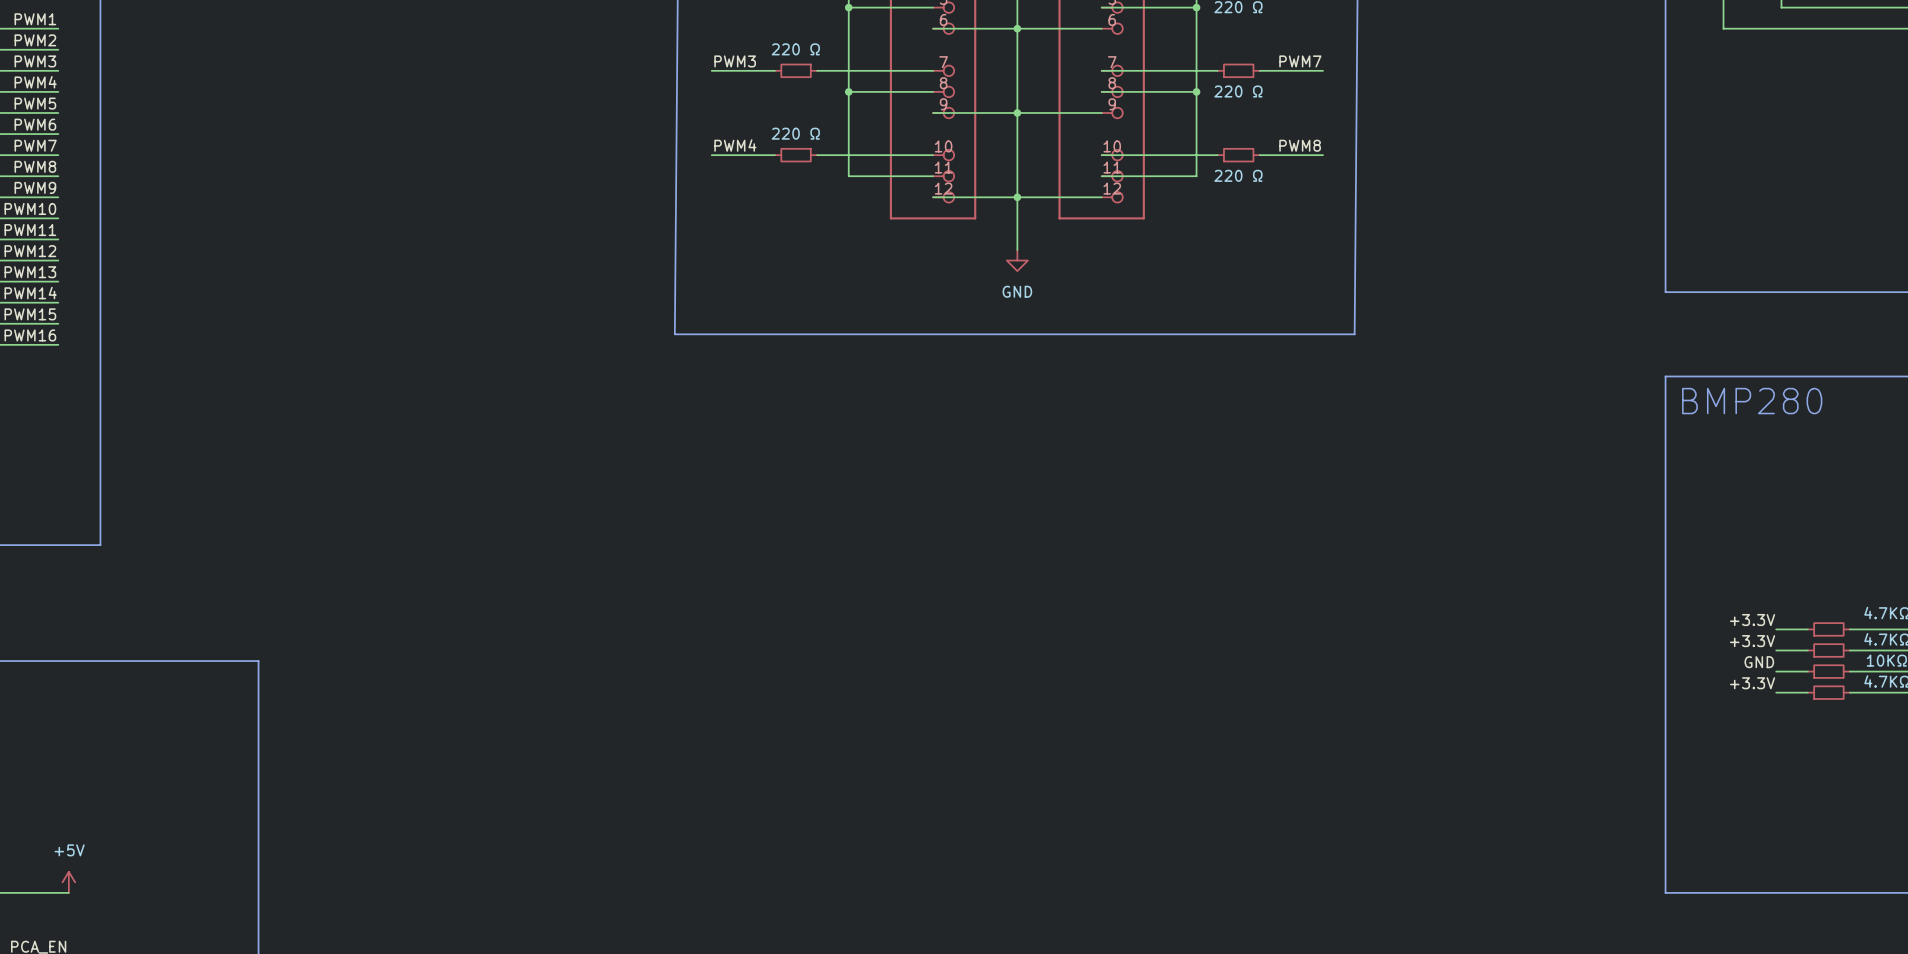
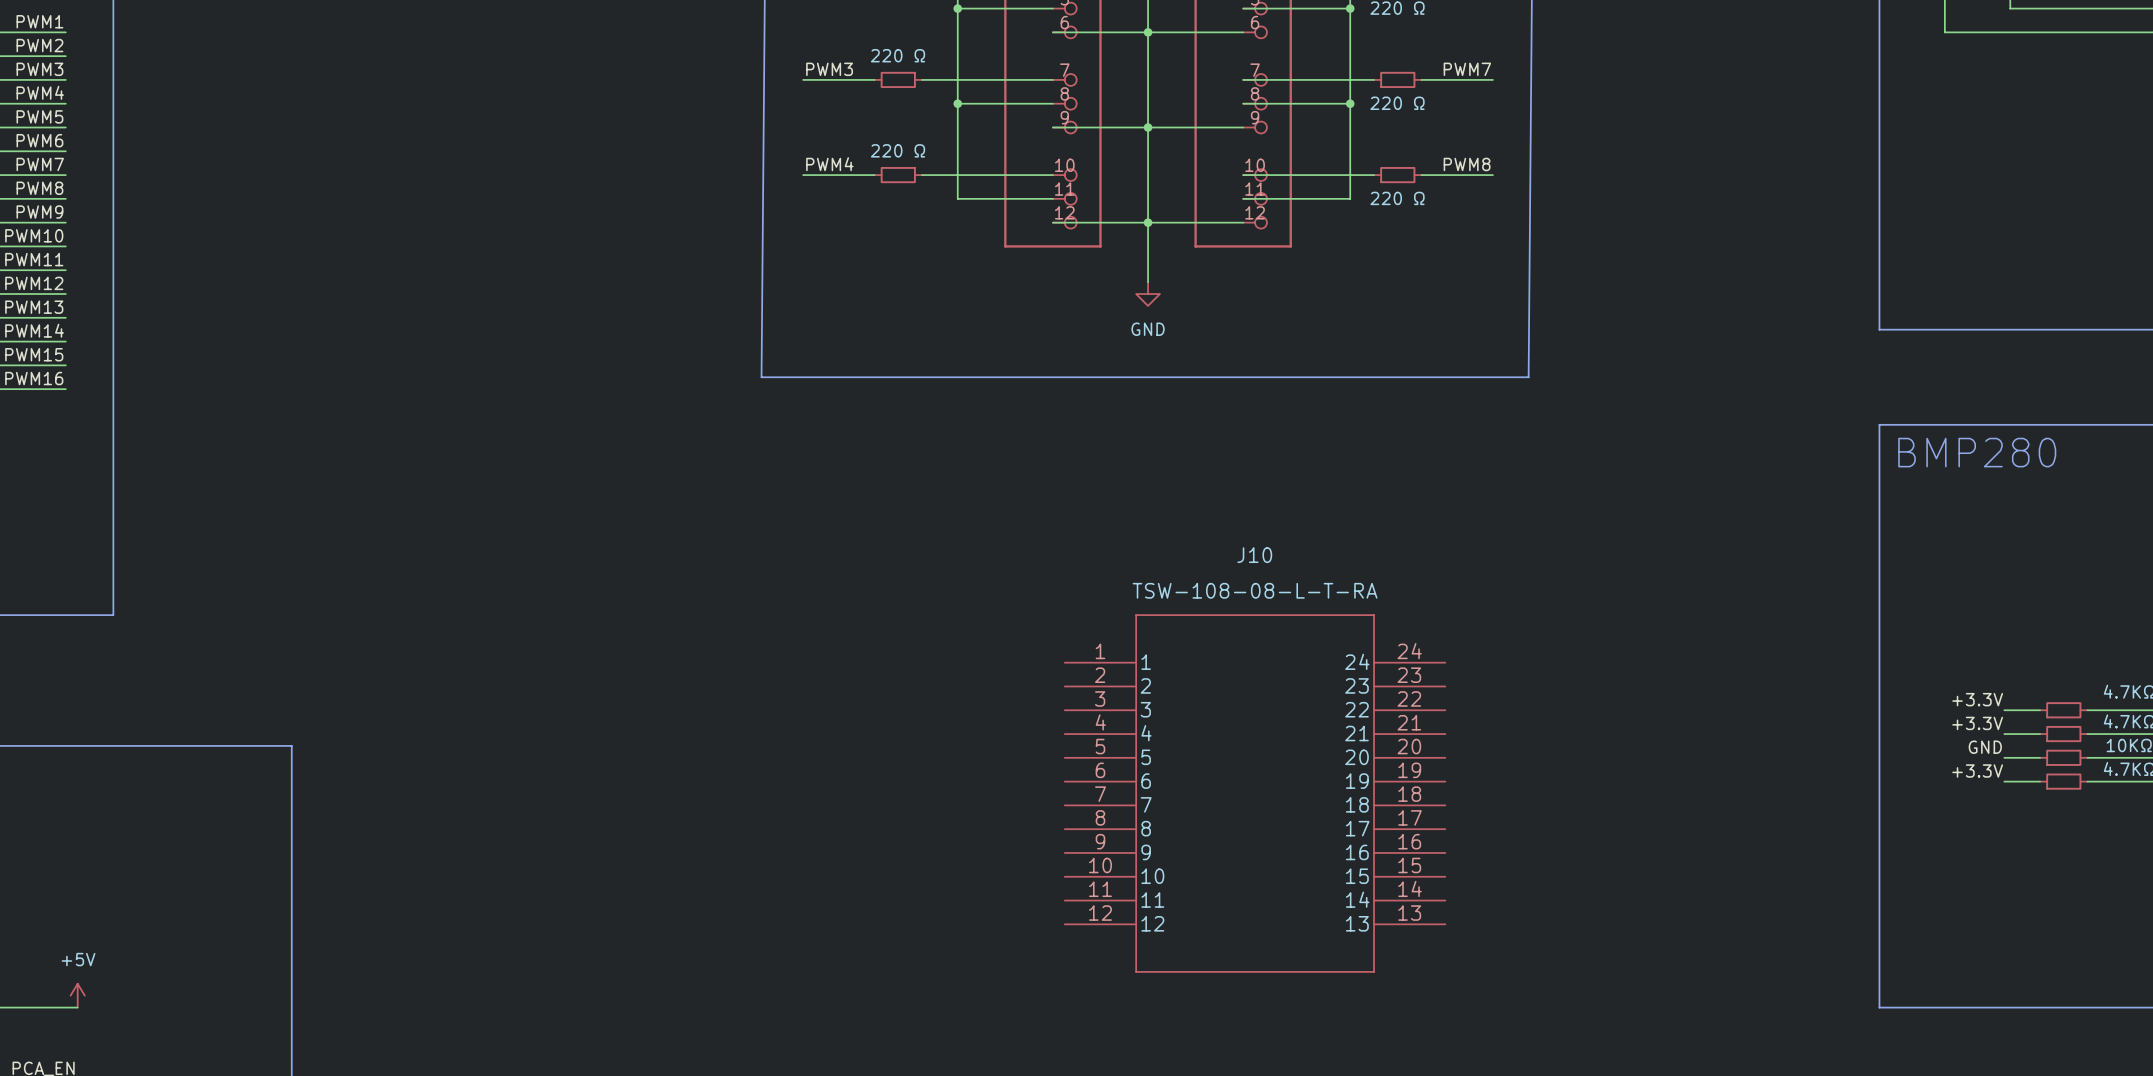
J10: none -> TSW-108-08-L-T-RA (1255, 793)

